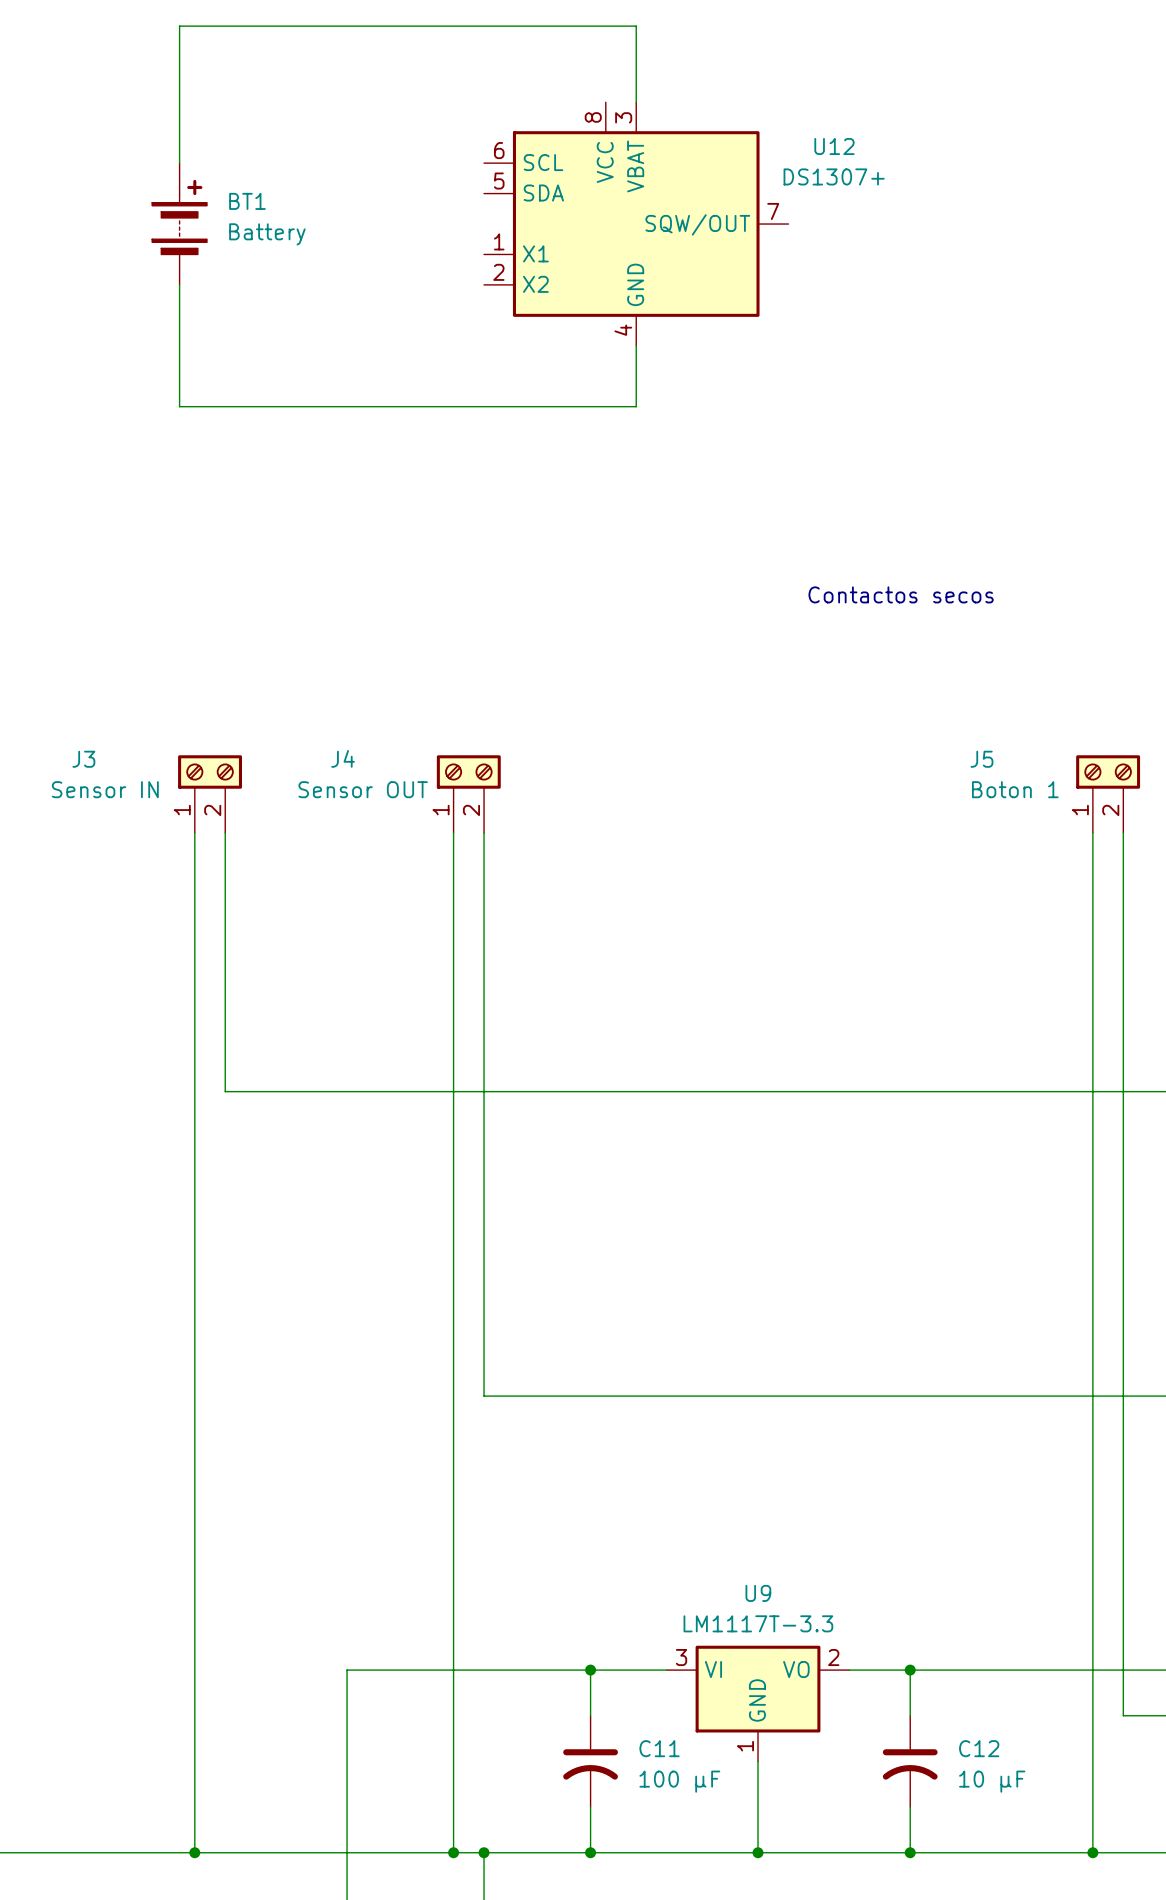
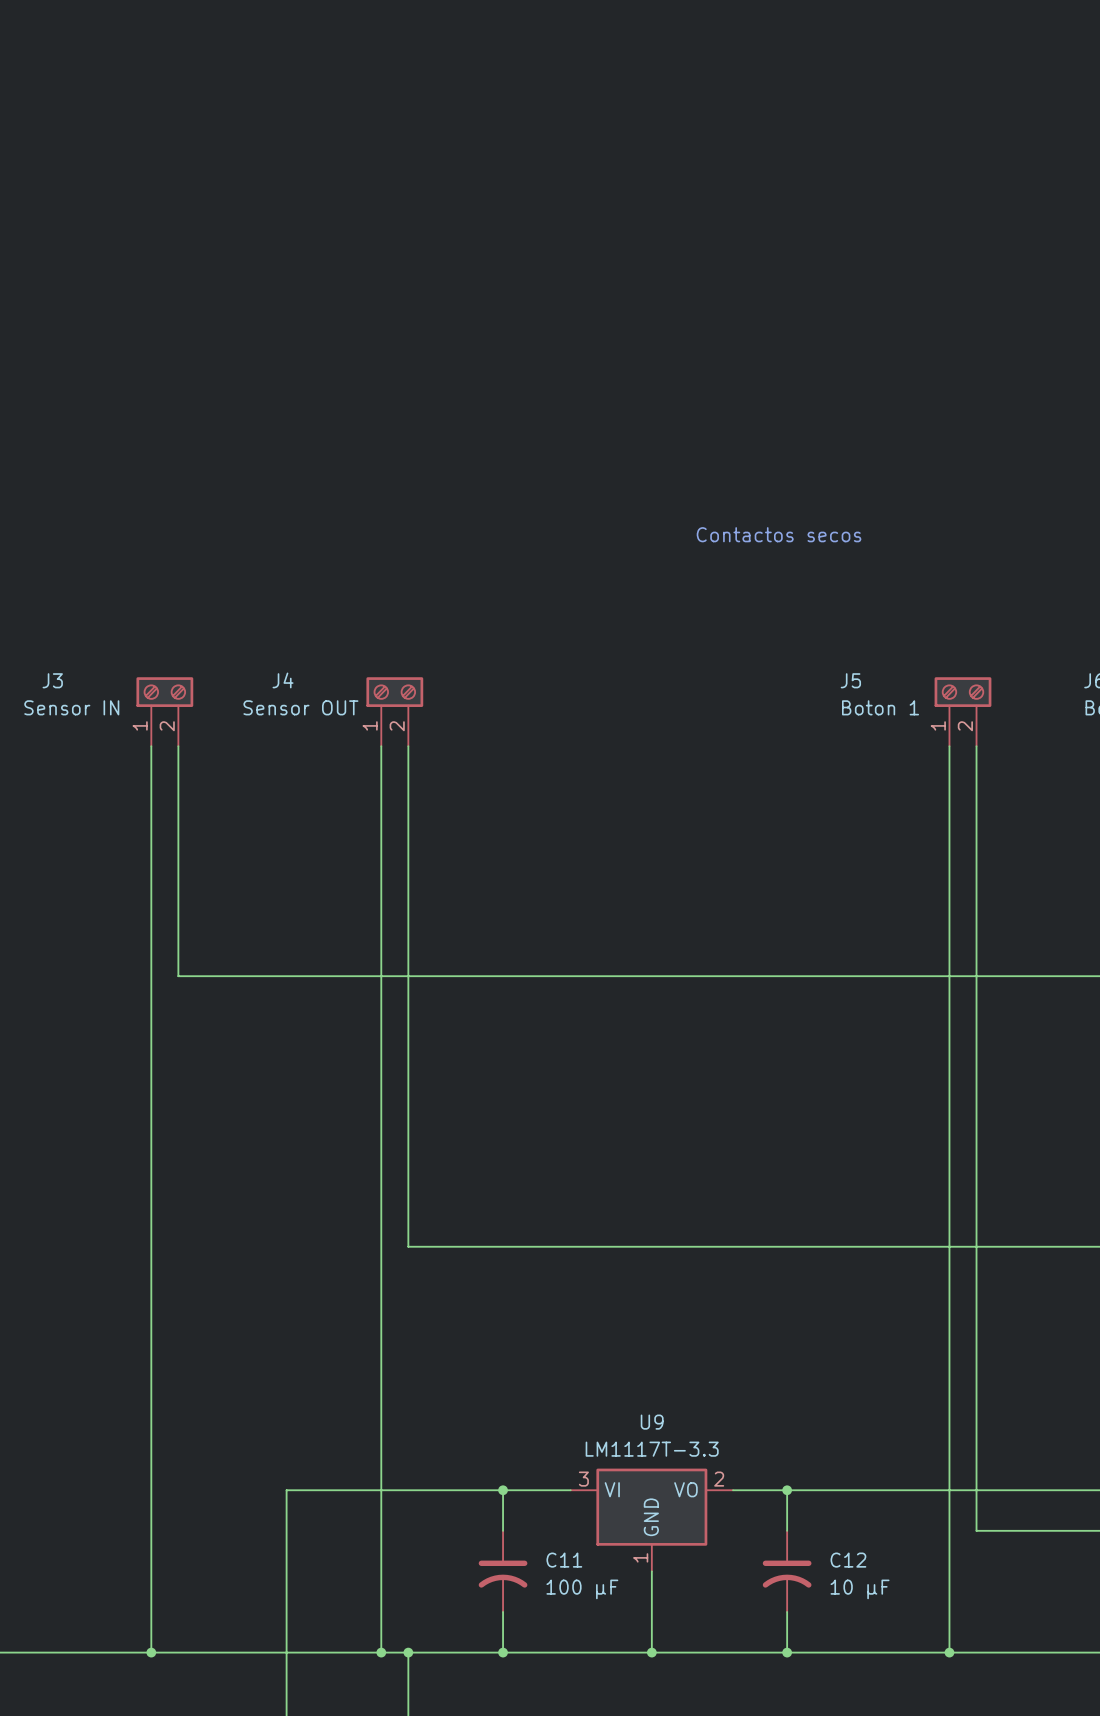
wire: (636, 102) (636, 26) (179, 26) (179, 163) -> none
BT1: Battery (179, 224) -> none
U12: DS1307+ (636, 224) -> none
wire: (179, 284) (179, 406) (636, 406) (636, 345) -> none

